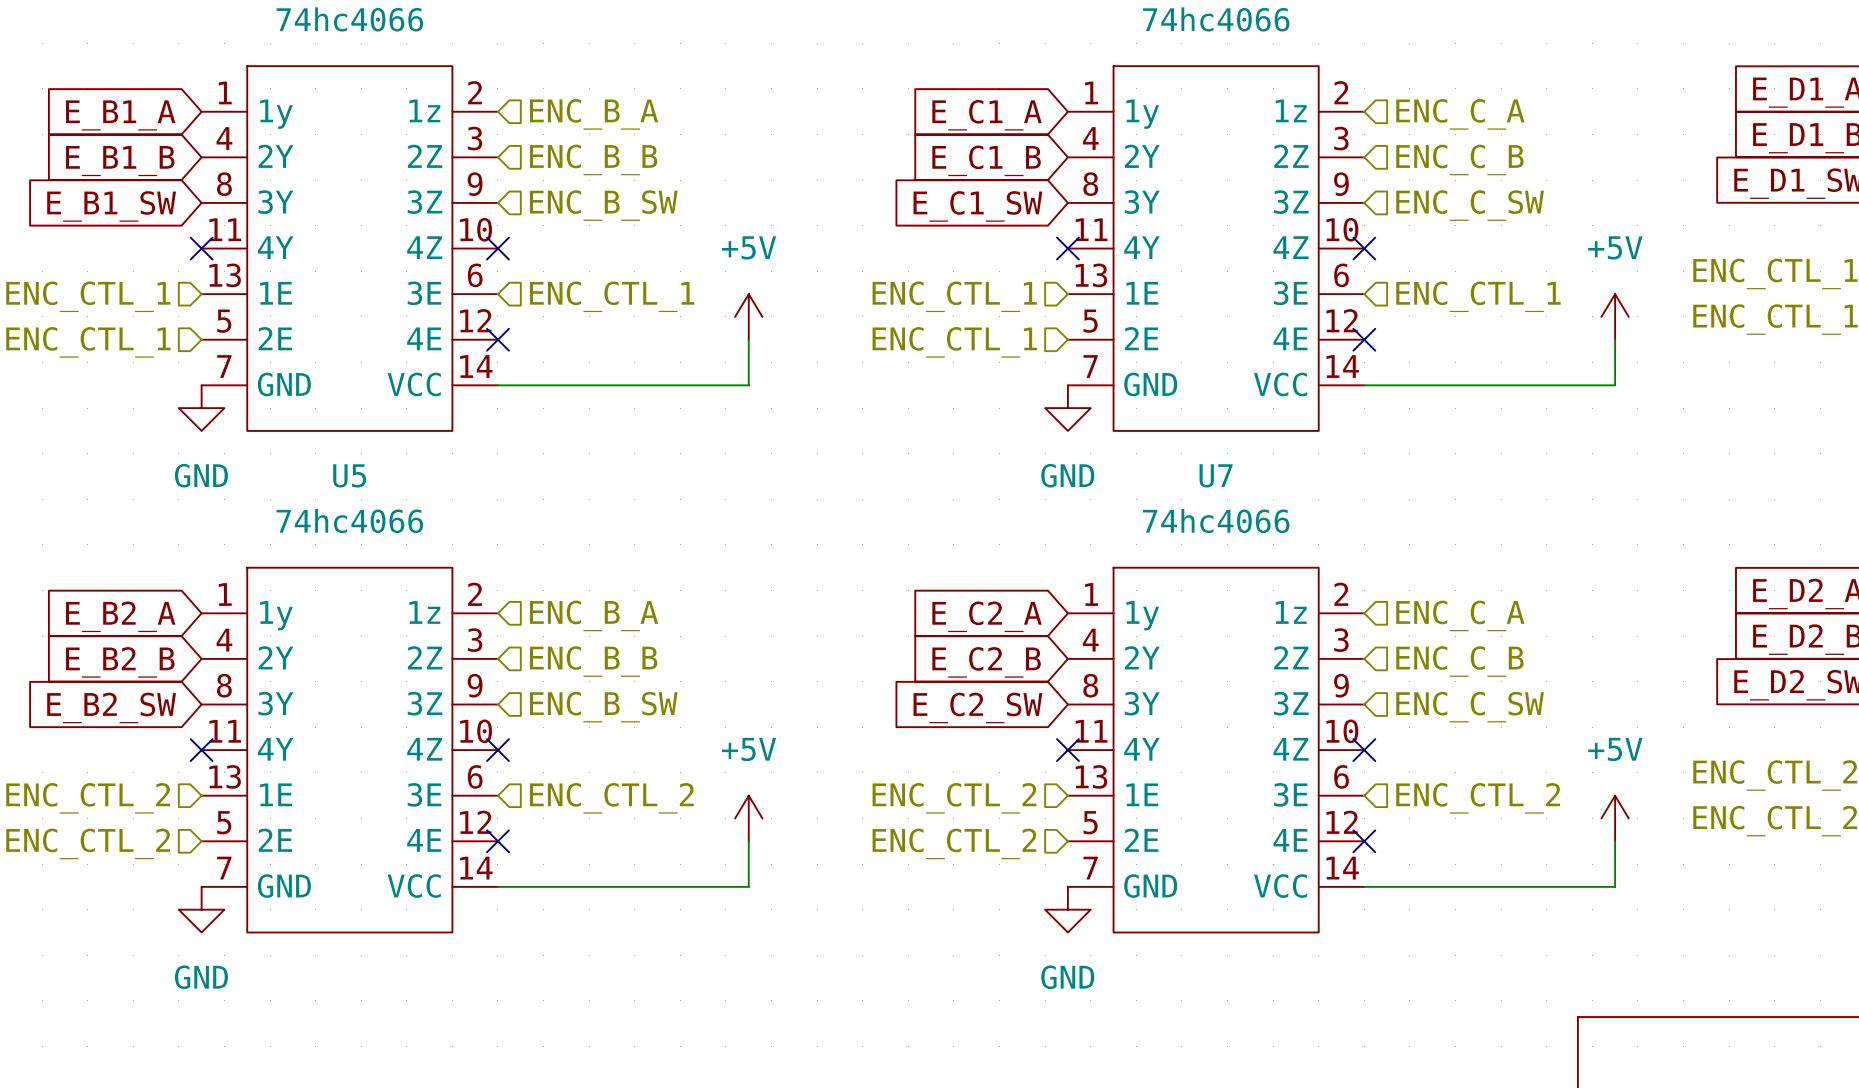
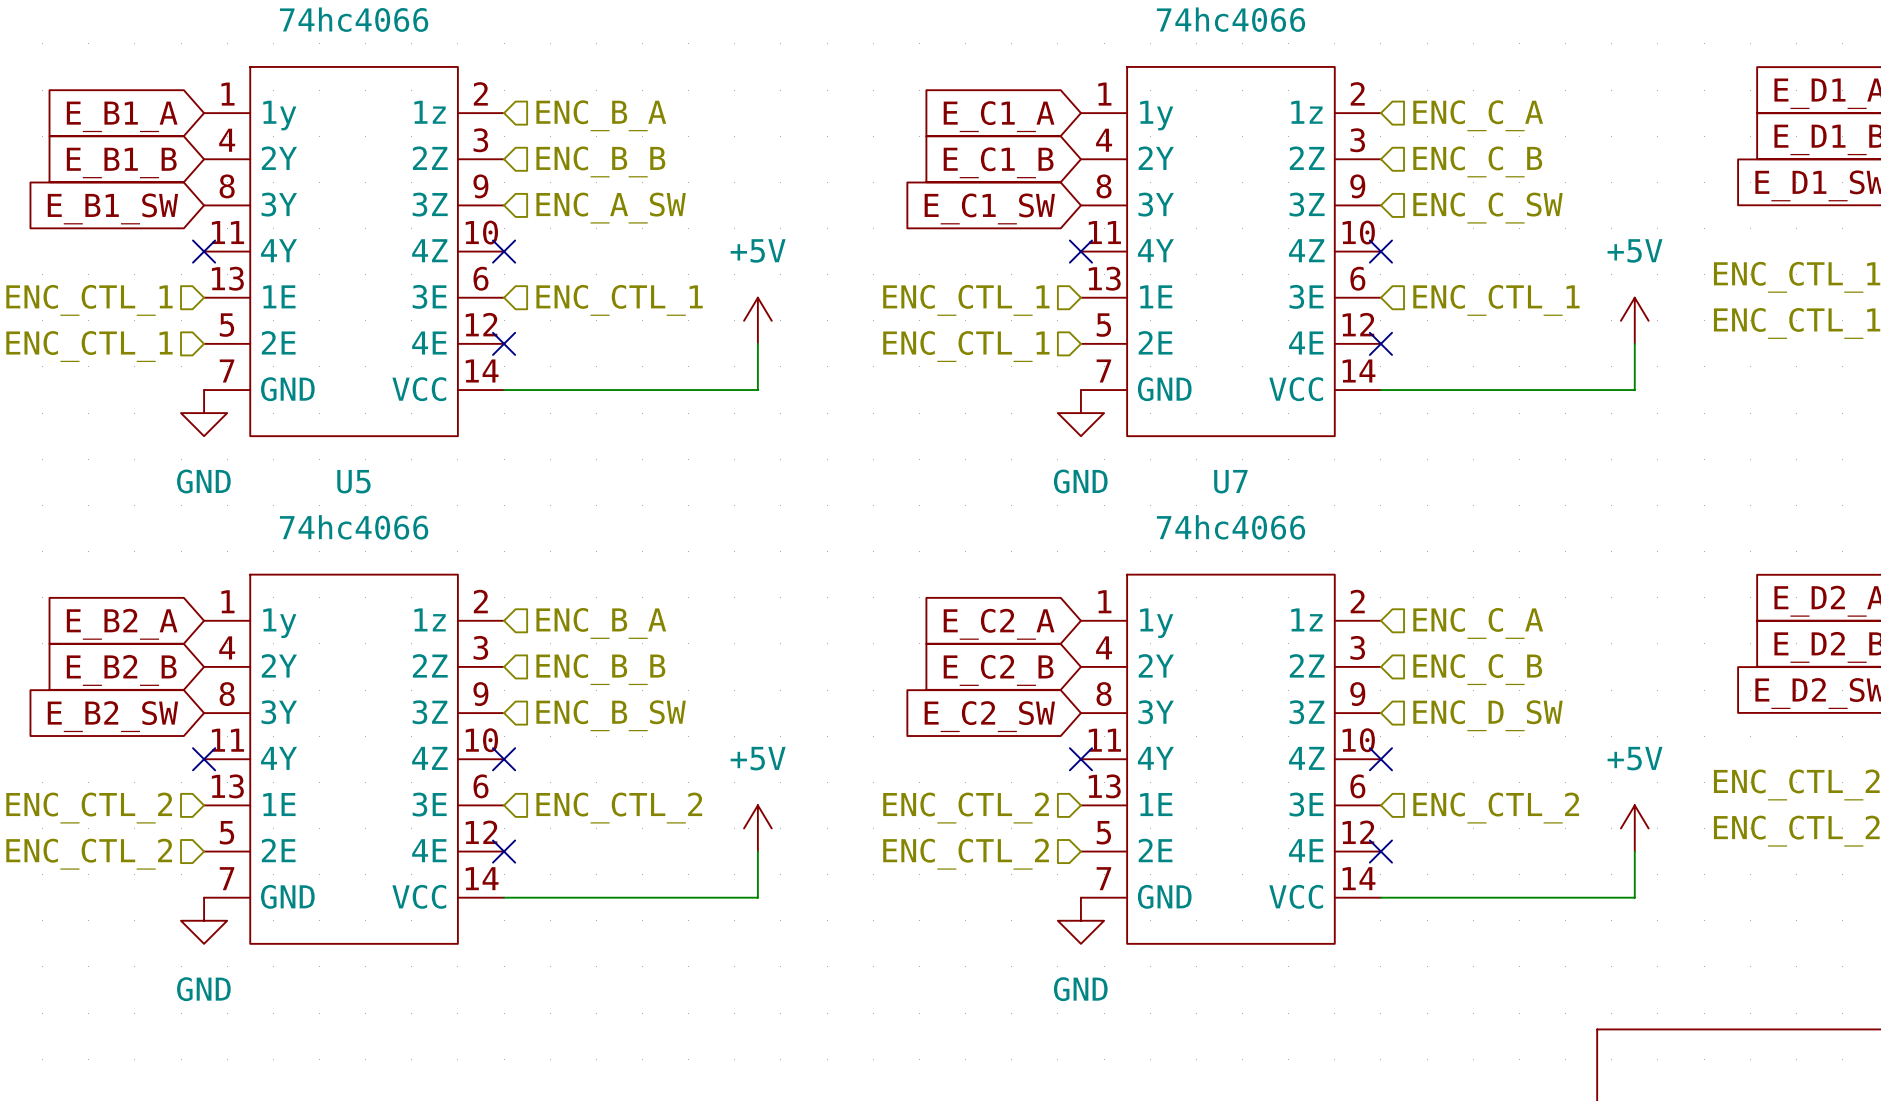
hierarchical label: ENC_B_SW (603, 205) -> ENC_A_SW (611, 208)
hierarchical label: ENC_C_SW (1470, 707) -> ENC_D_SW (1488, 715)

